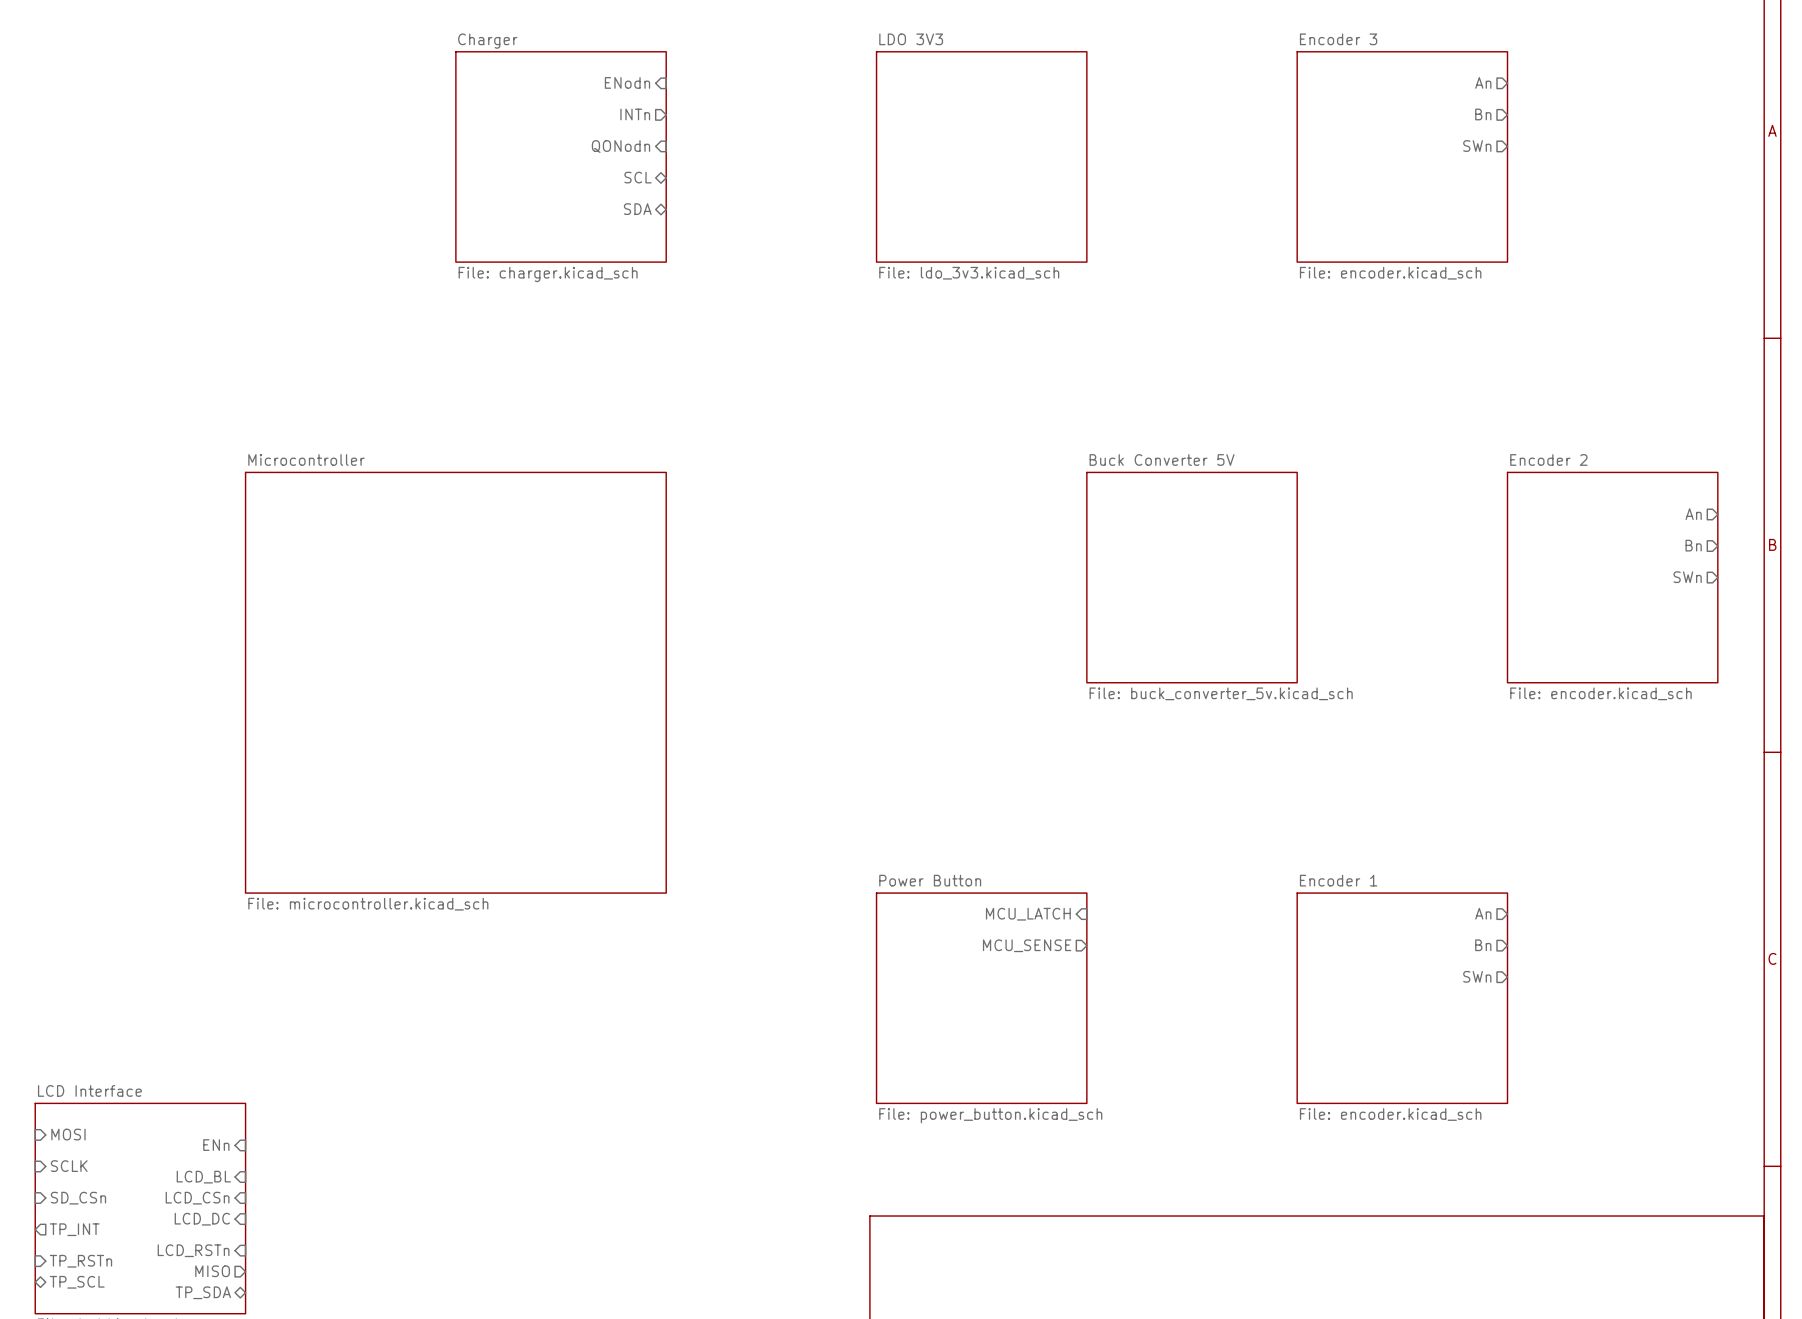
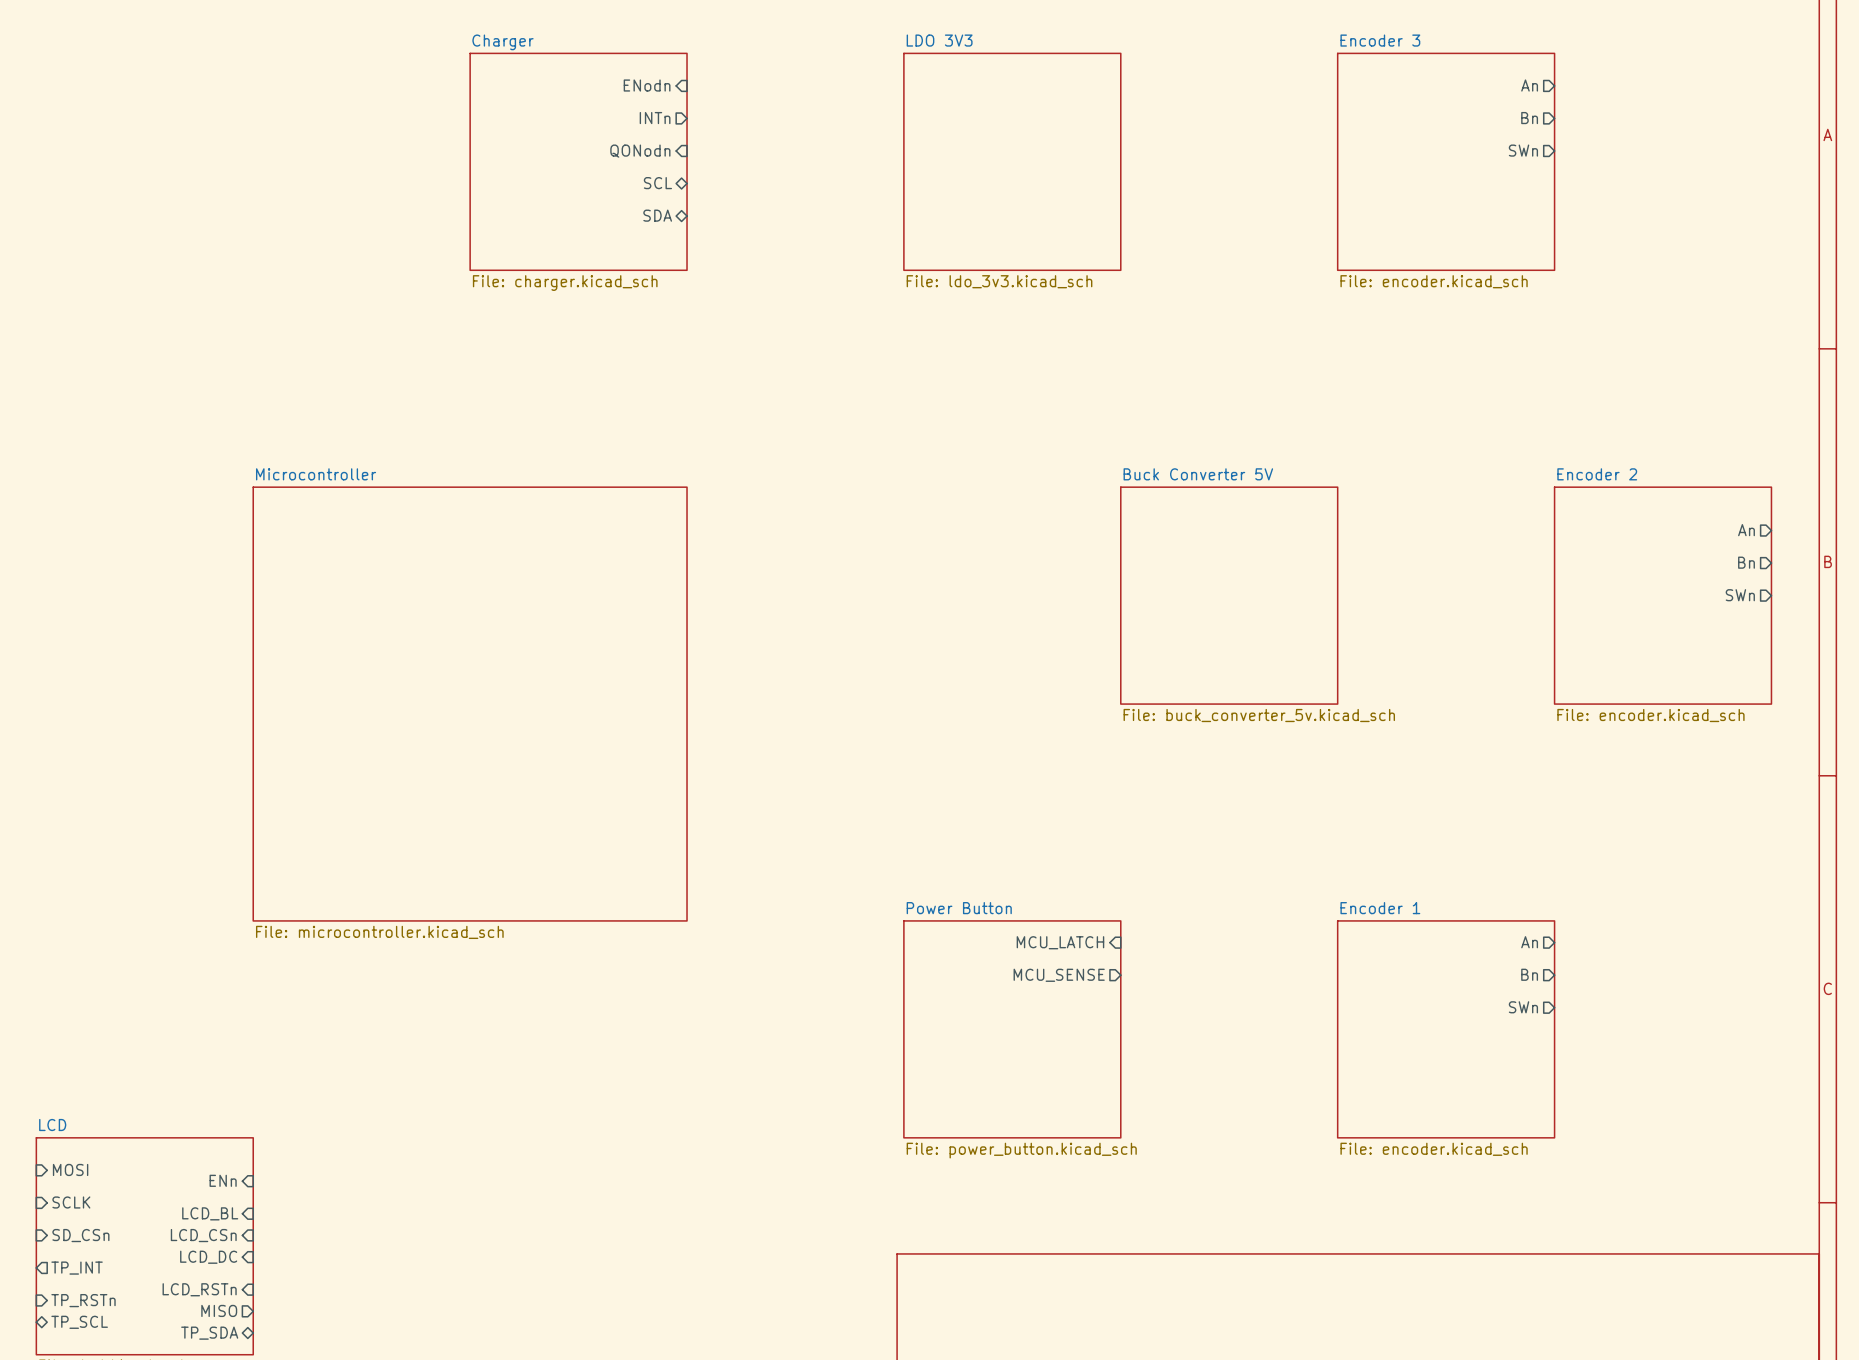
sheet LCD Interface name: LCD Interface (89, 1090) -> LCD (52, 1125)

